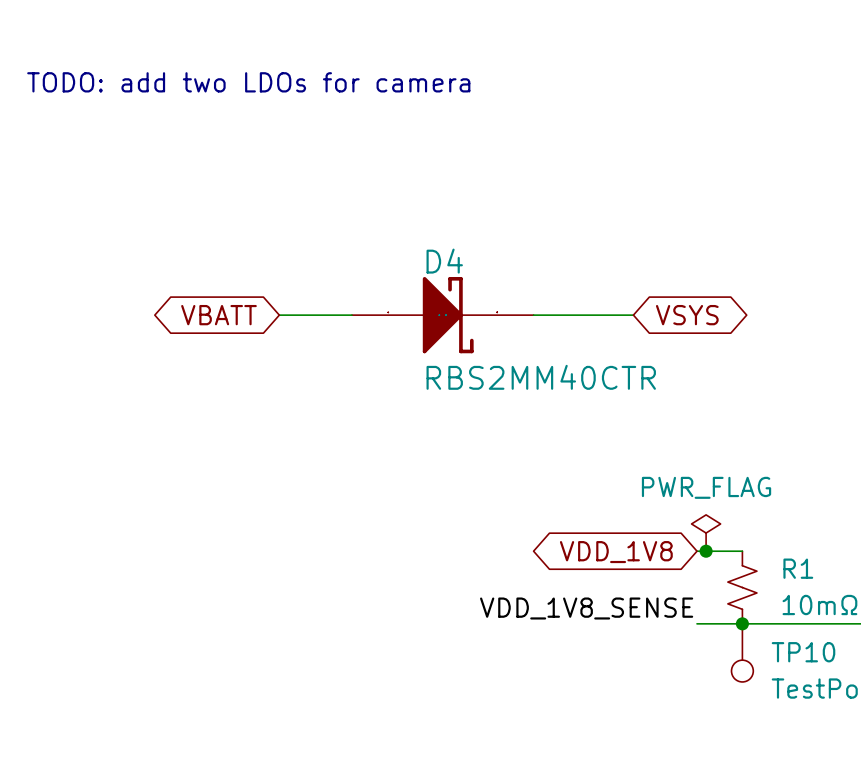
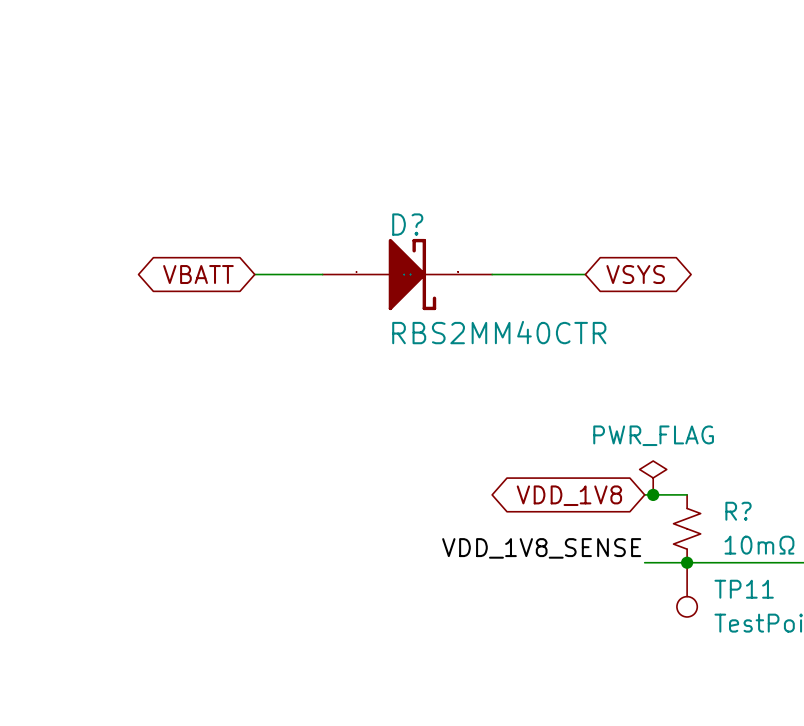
text: TODO: add two LDOs for camera (248, 82) -> none
D4 name: D4 (444, 261) -> D? (407, 224)
R1 name: R1 (798, 568) -> R? (738, 511)
TP10 name: TP10 (803, 652) -> TP11 (744, 589)

